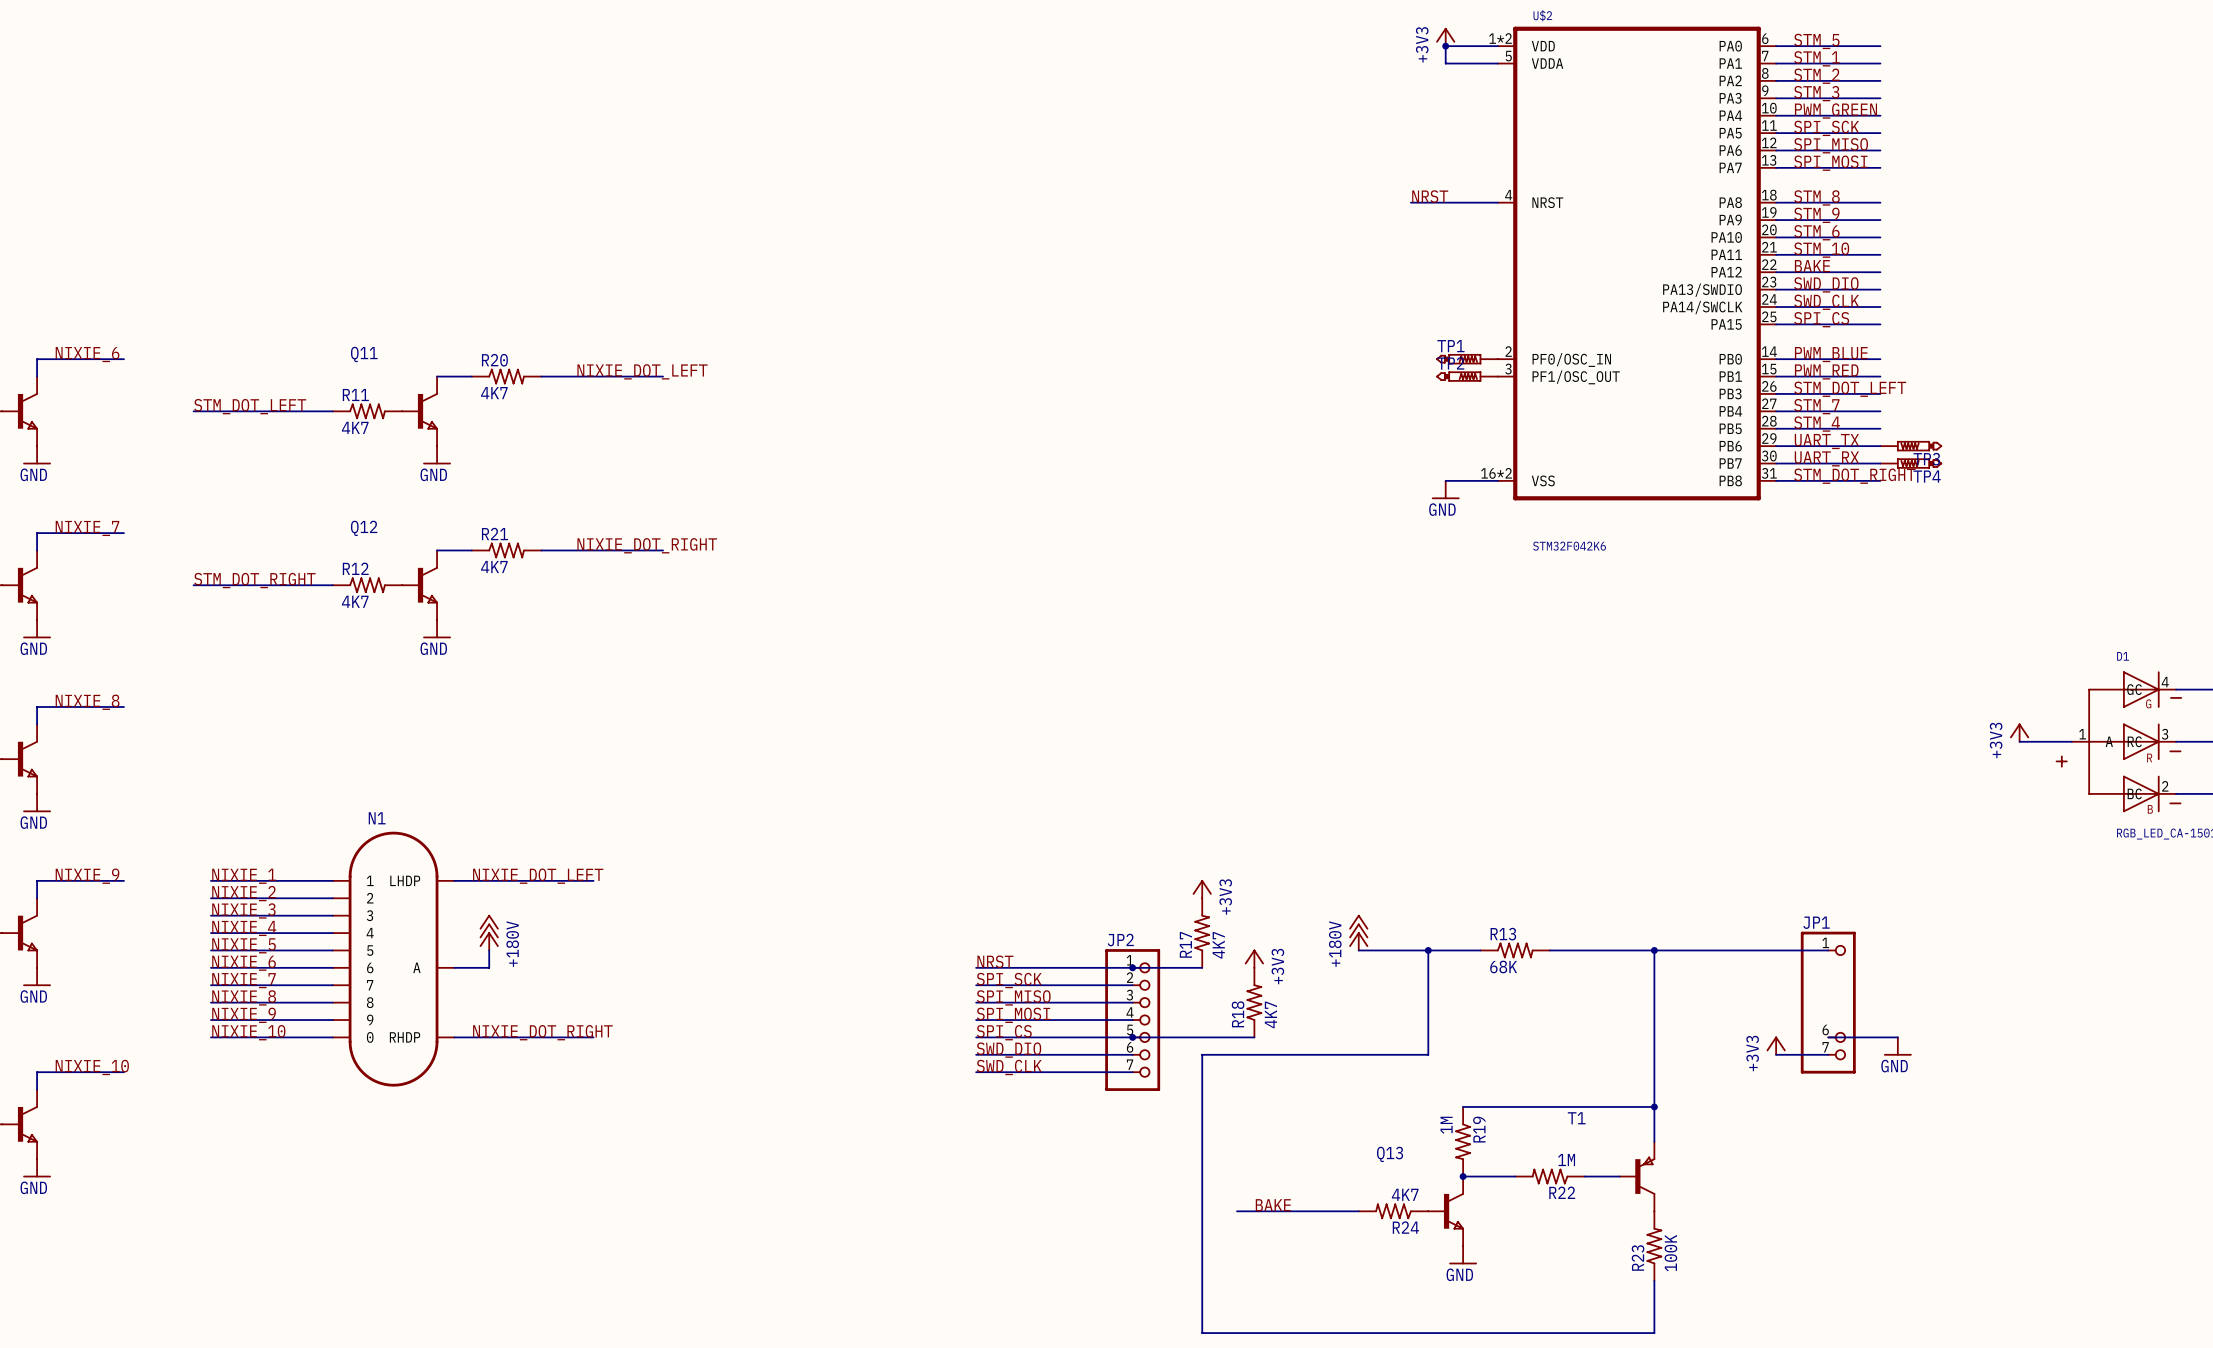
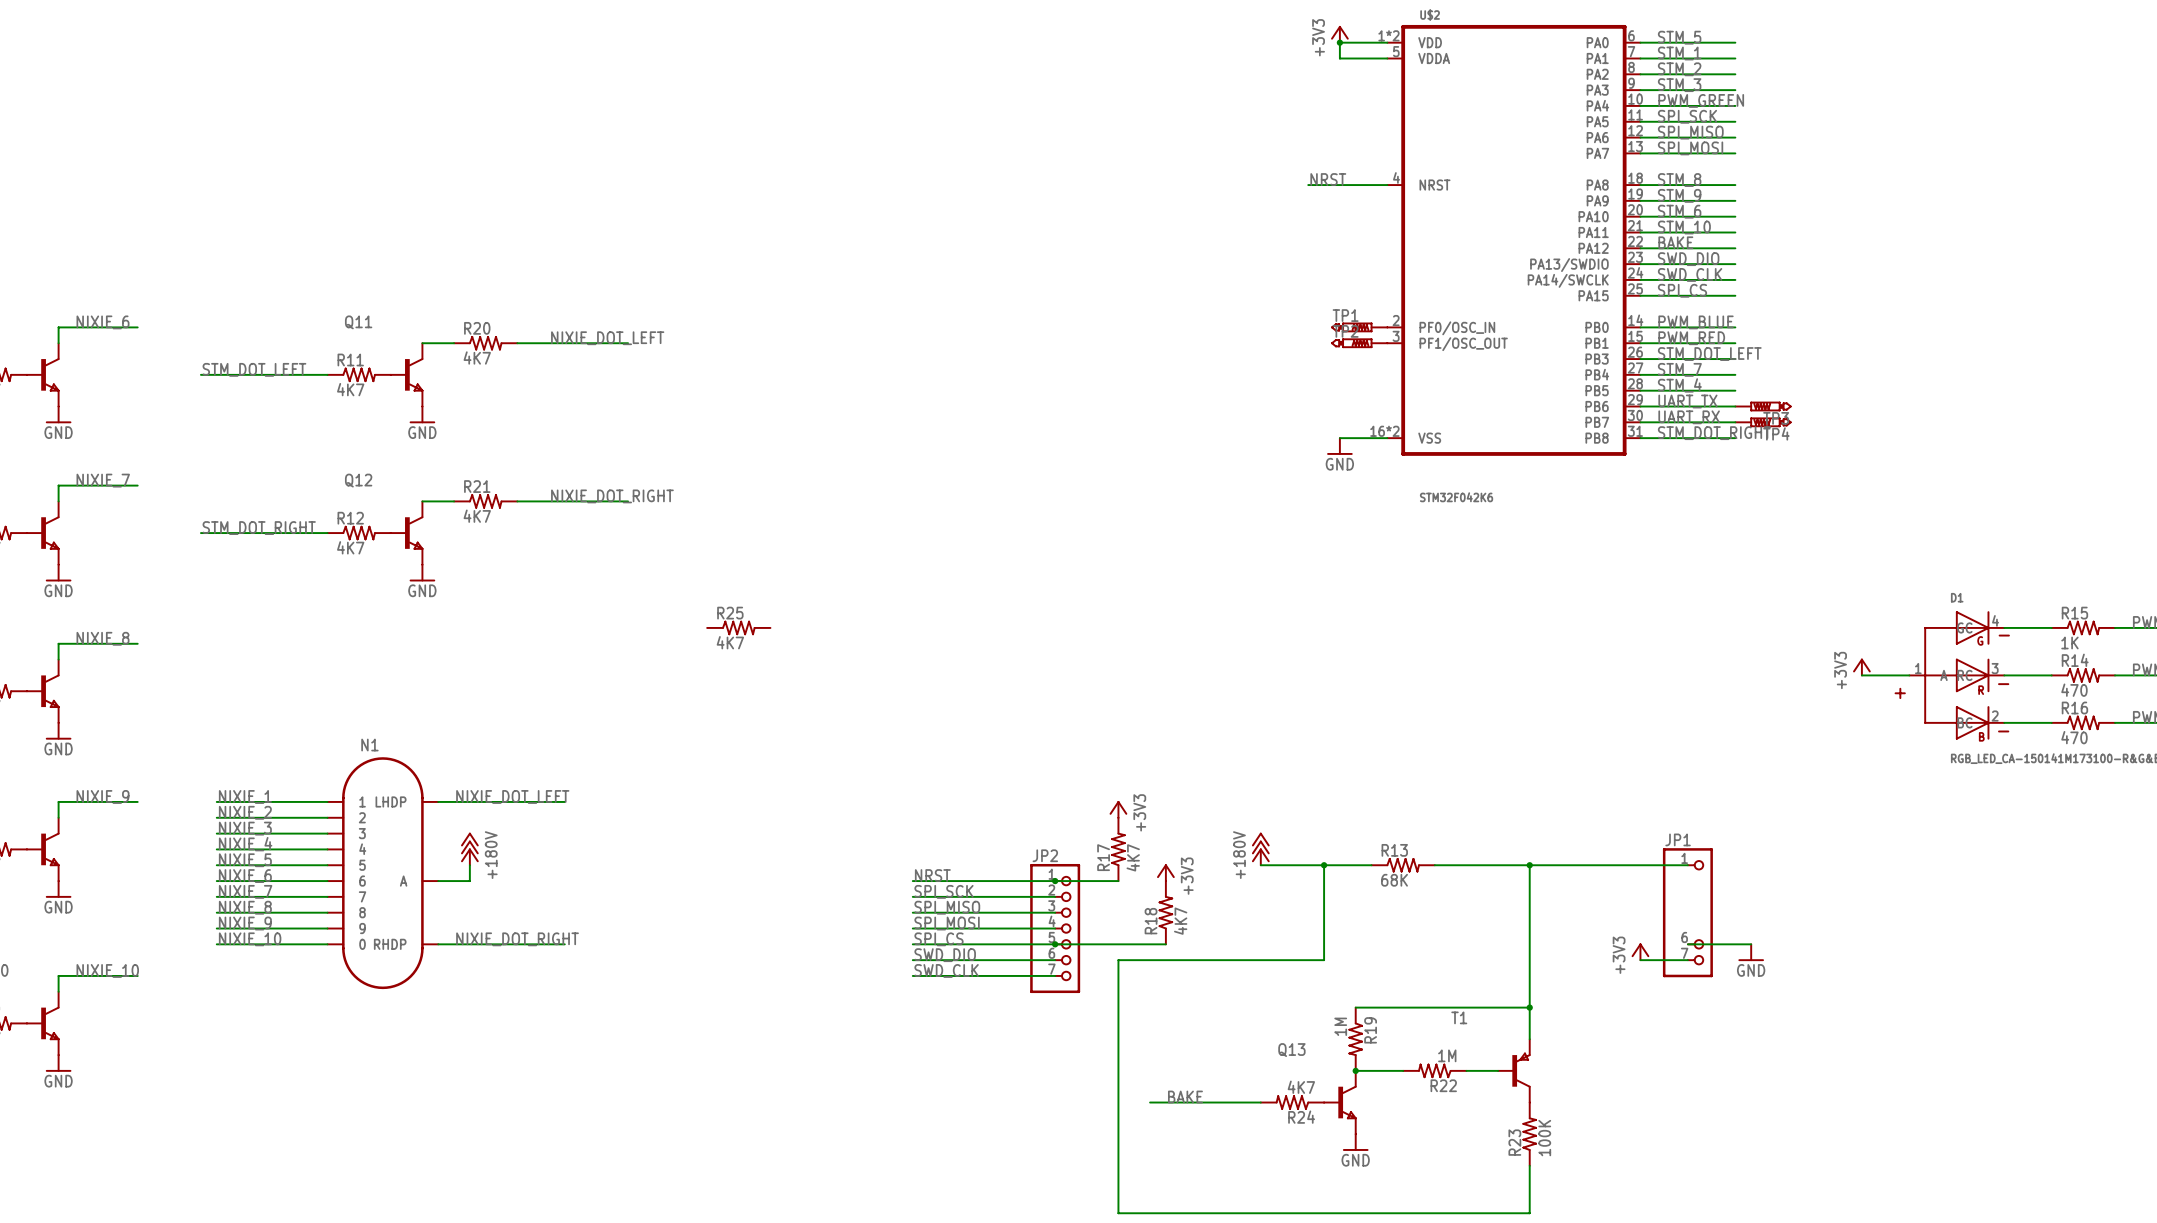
R25: none -> 4K7 (738, 627)

